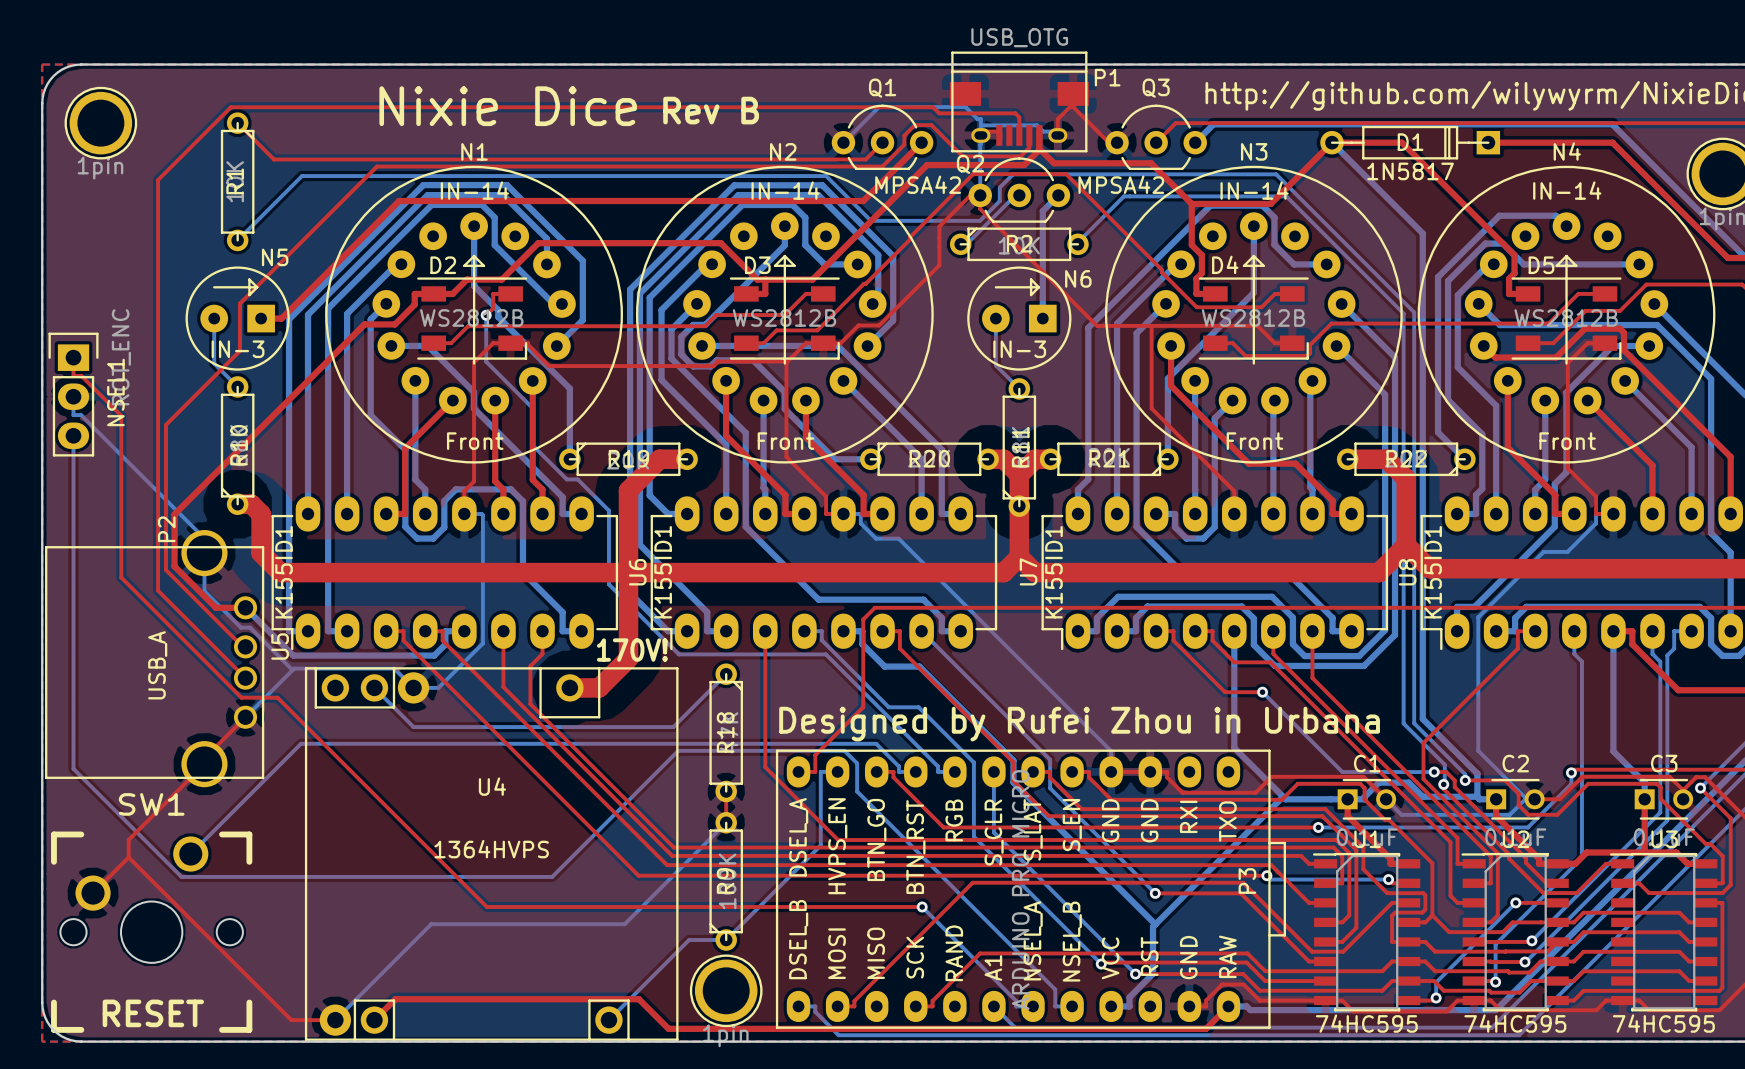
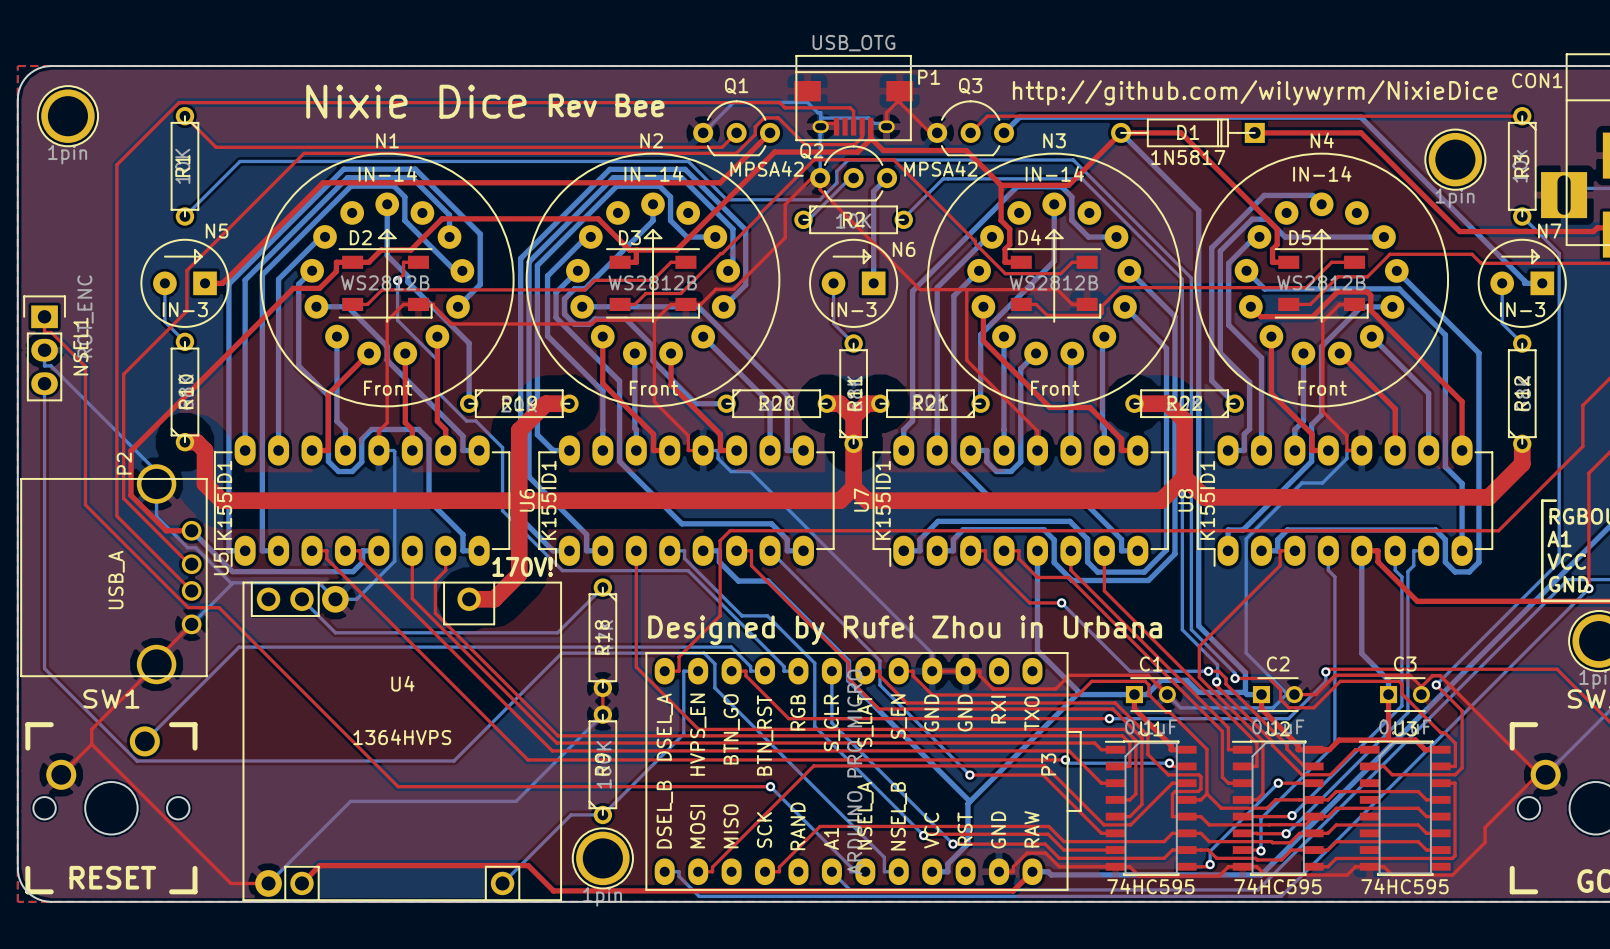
text: Rev B (711, 110) -> Rev Bee (606, 105)

